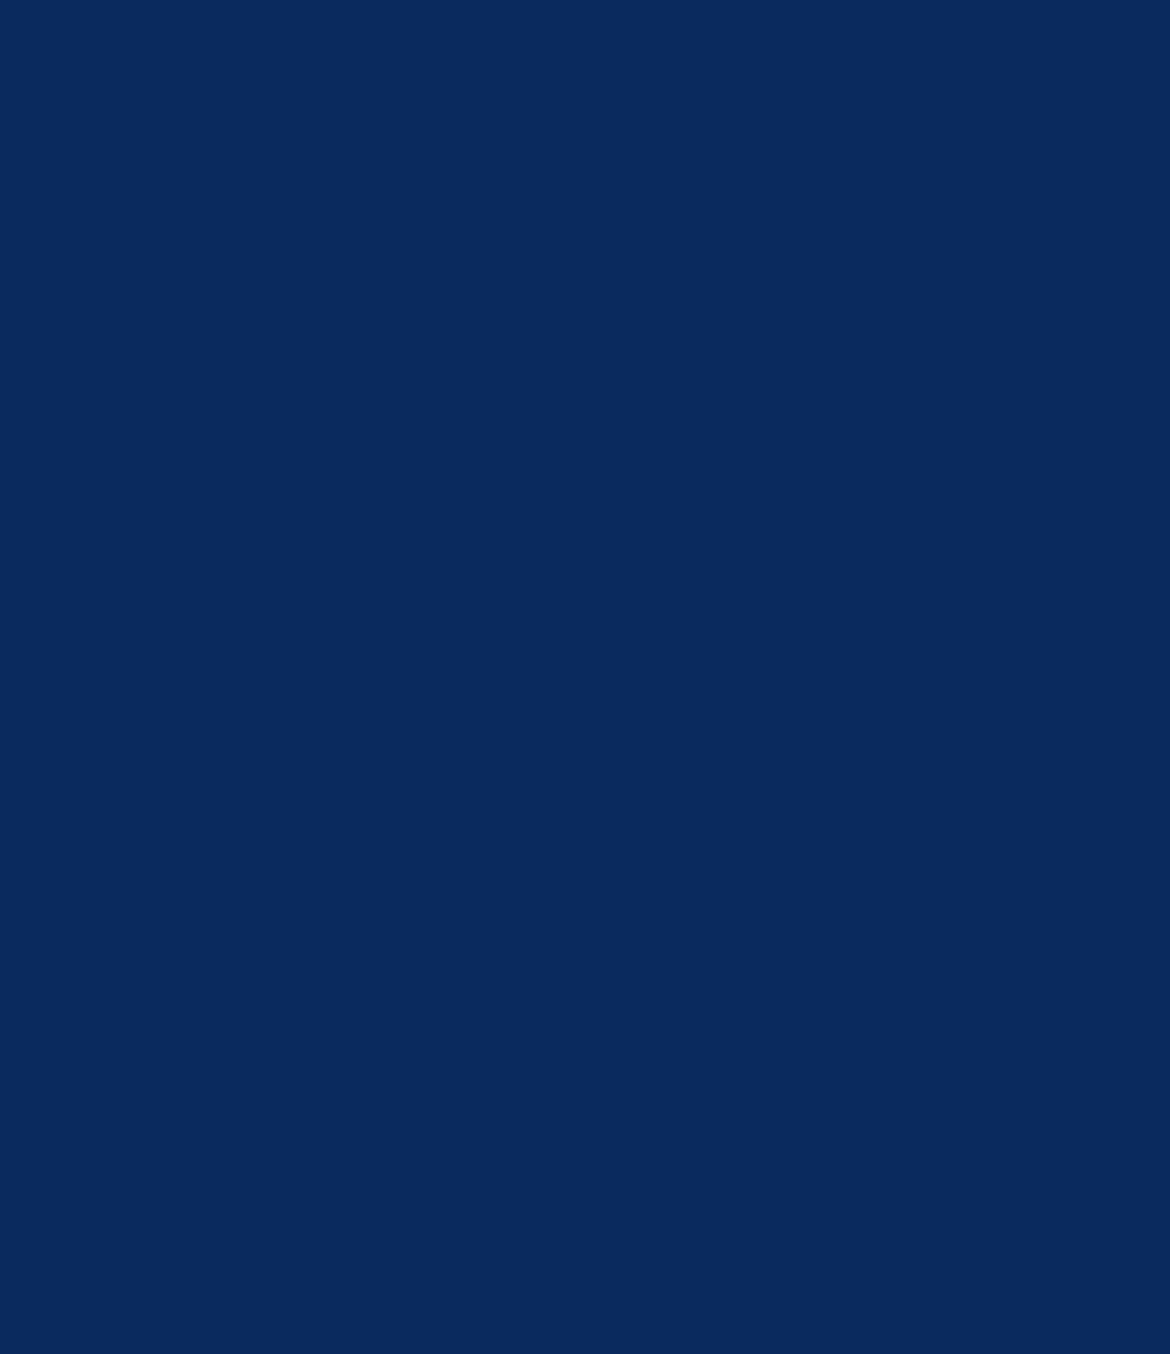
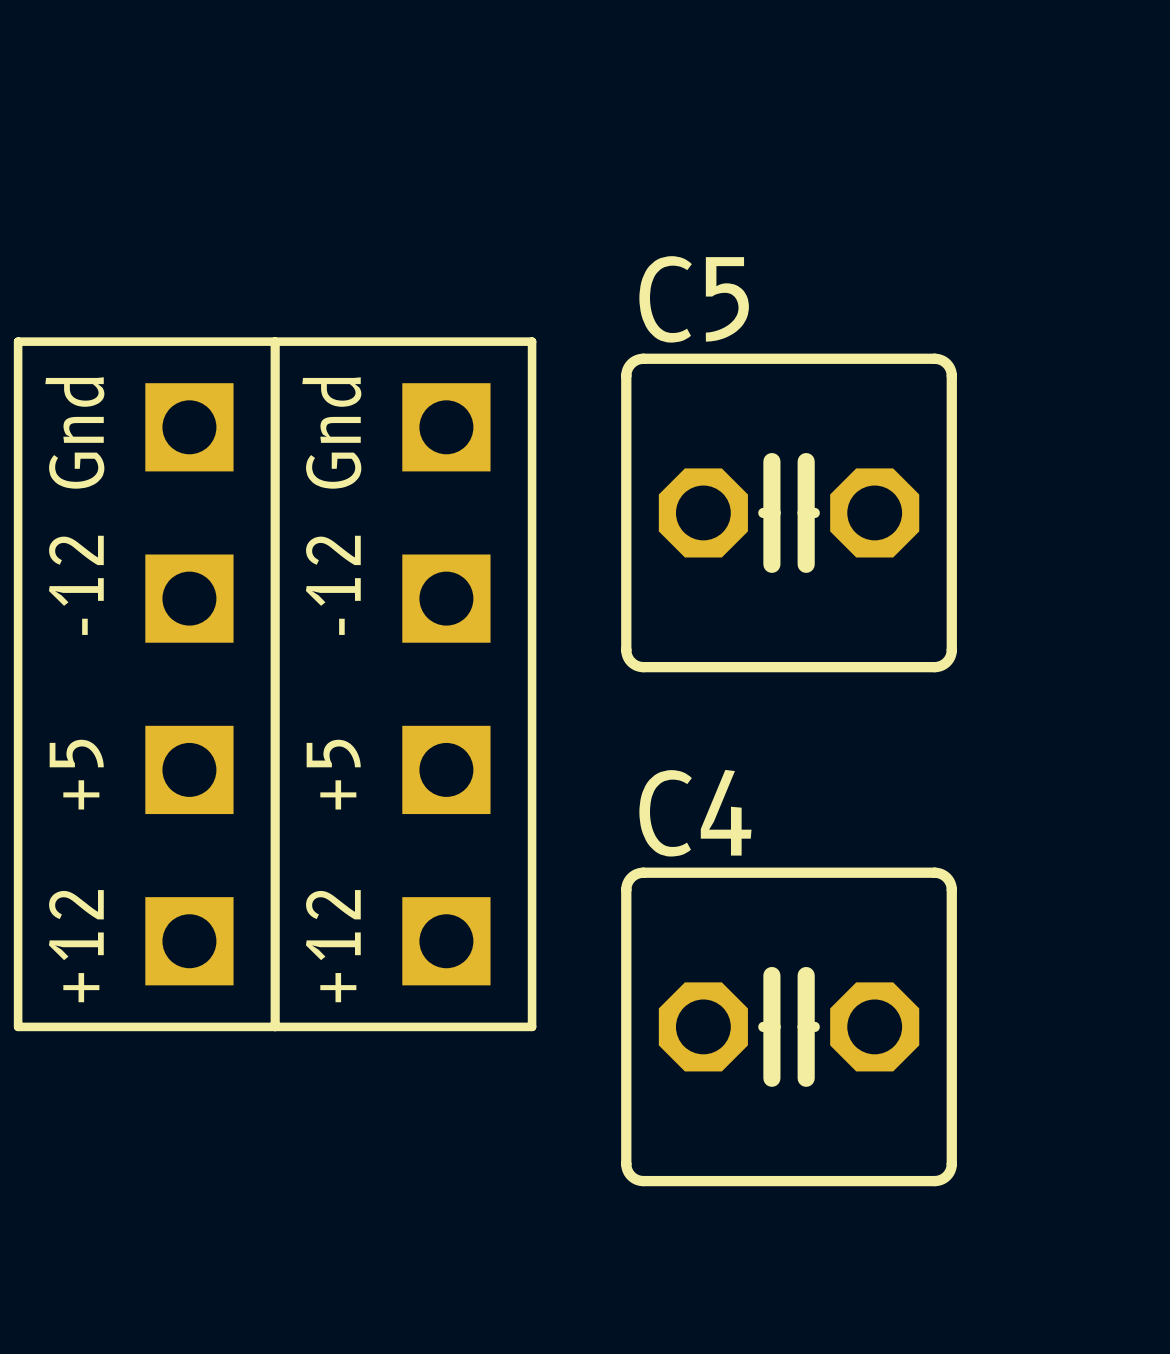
C5: none -> (789, 512)
part: none -> (146, 684)
part: none -> (403, 684)
C4: none -> (789, 1026)

